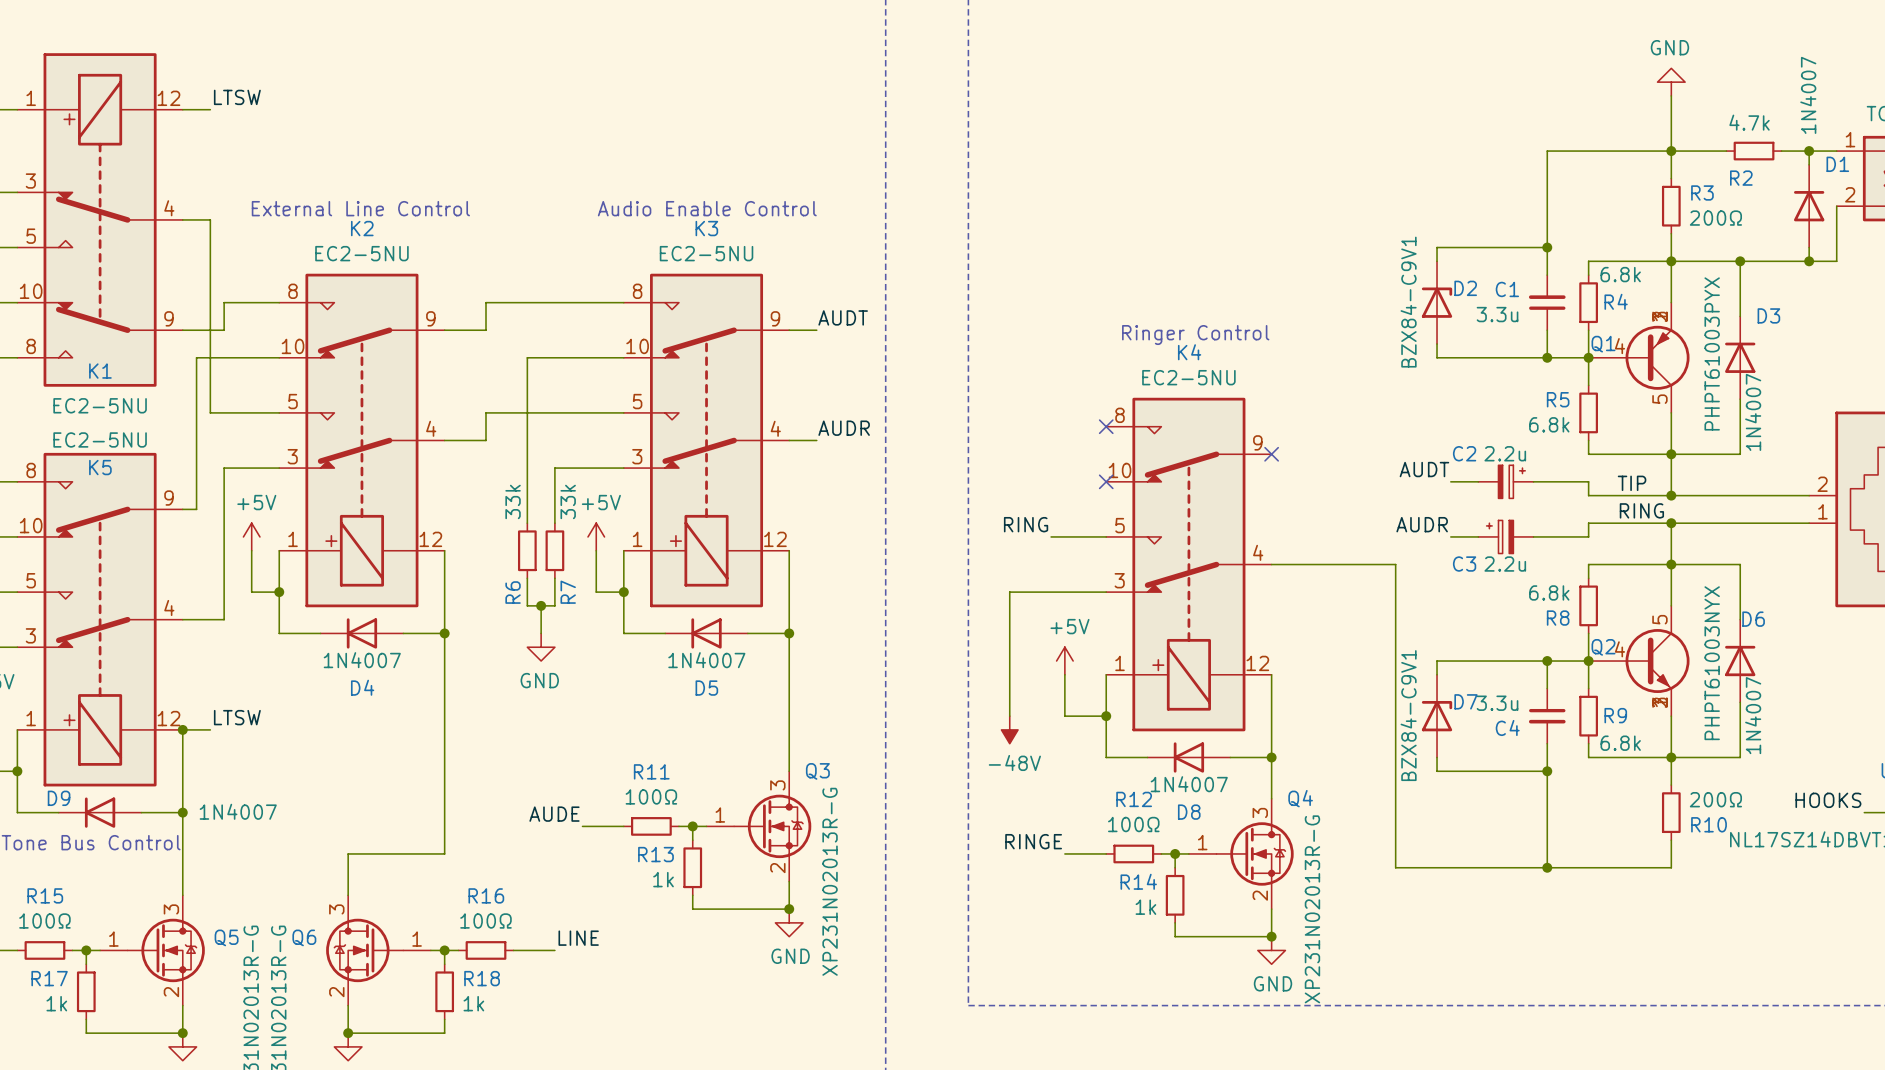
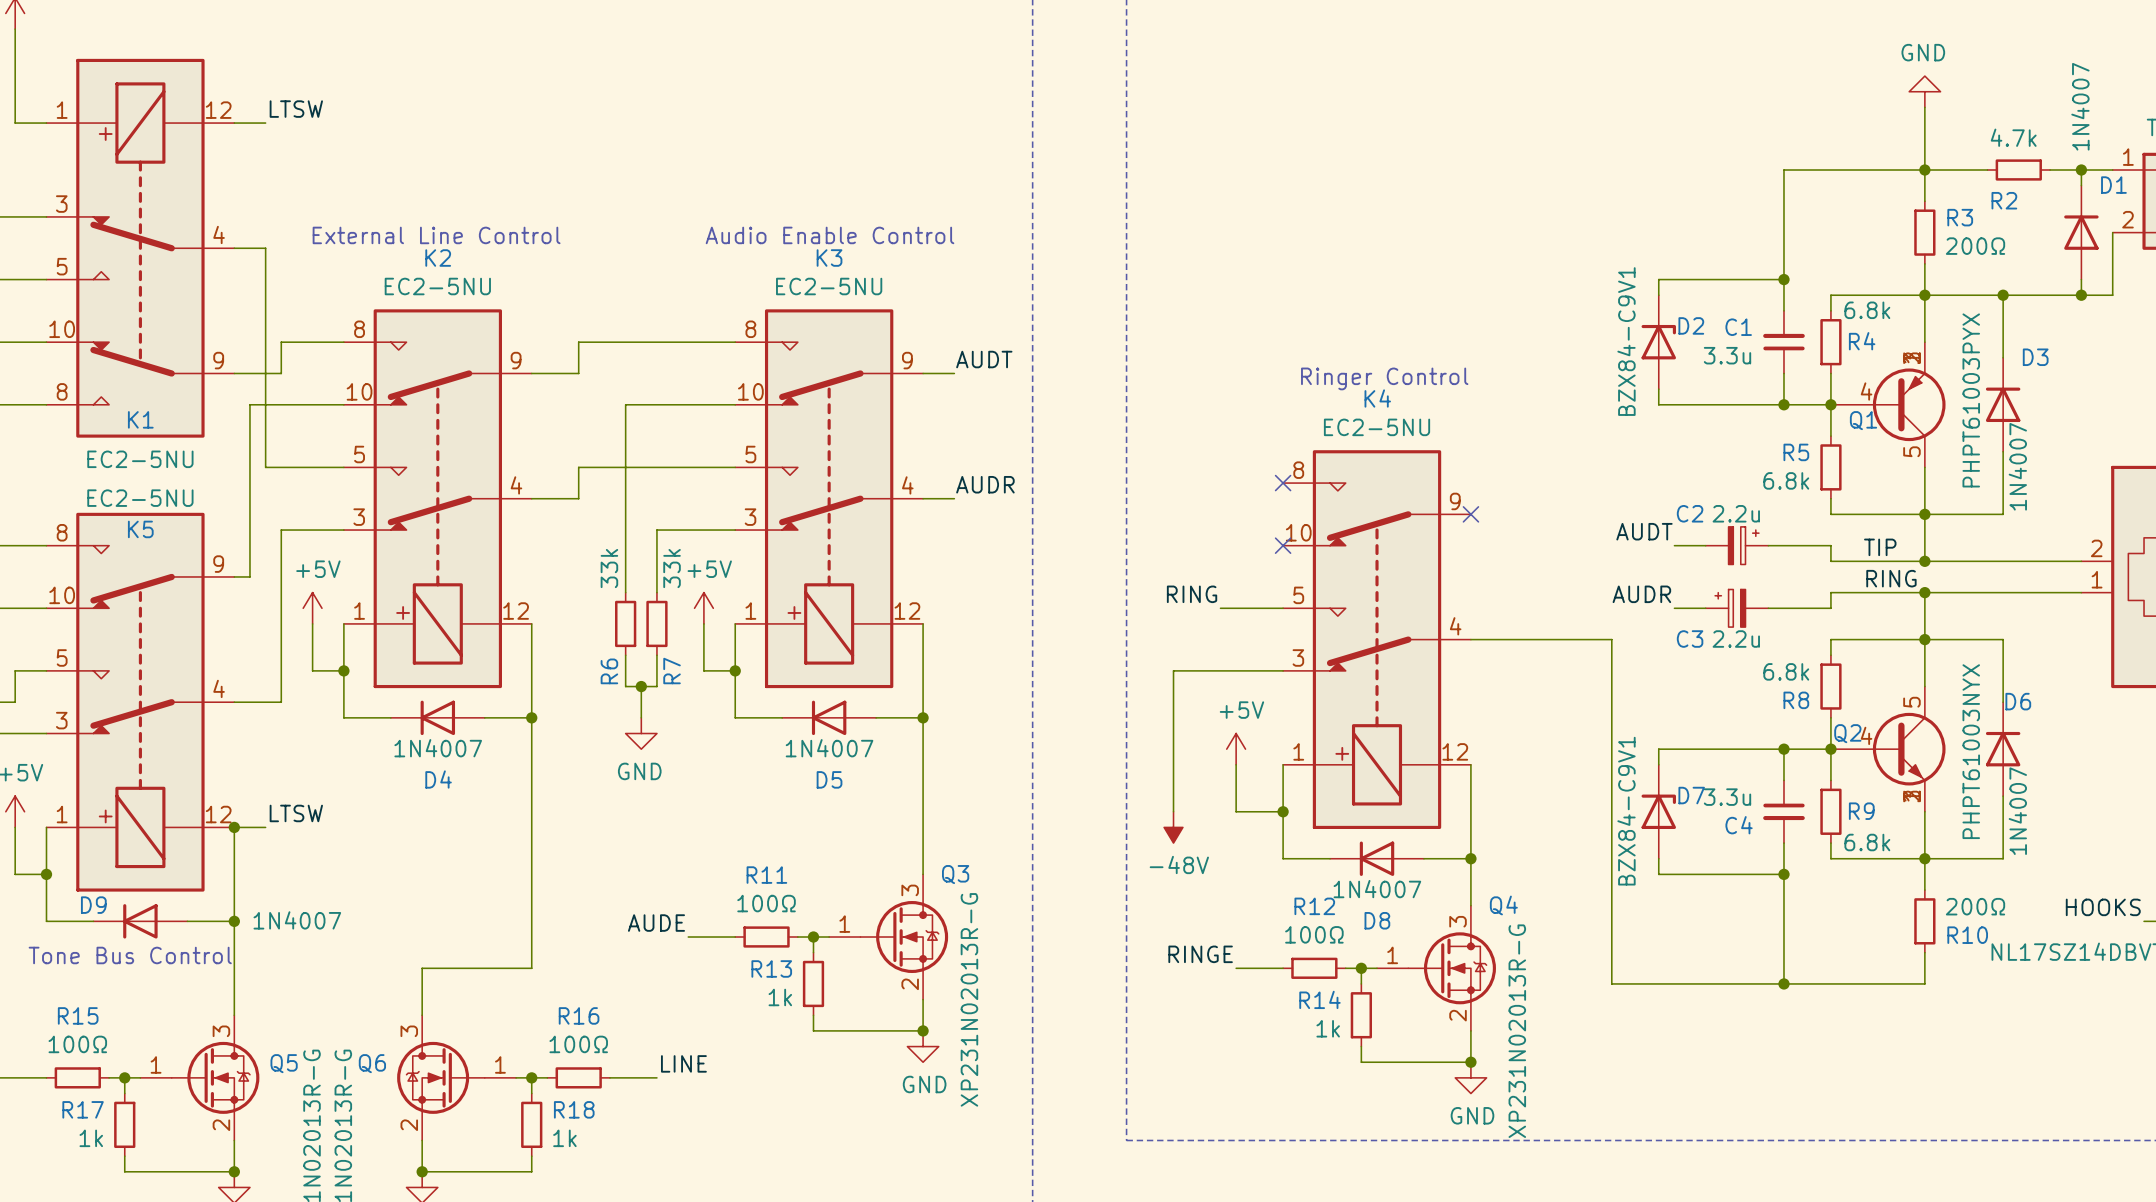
Q1 name position: Q1 (1603, 344) -> Q1 (1863, 420)

